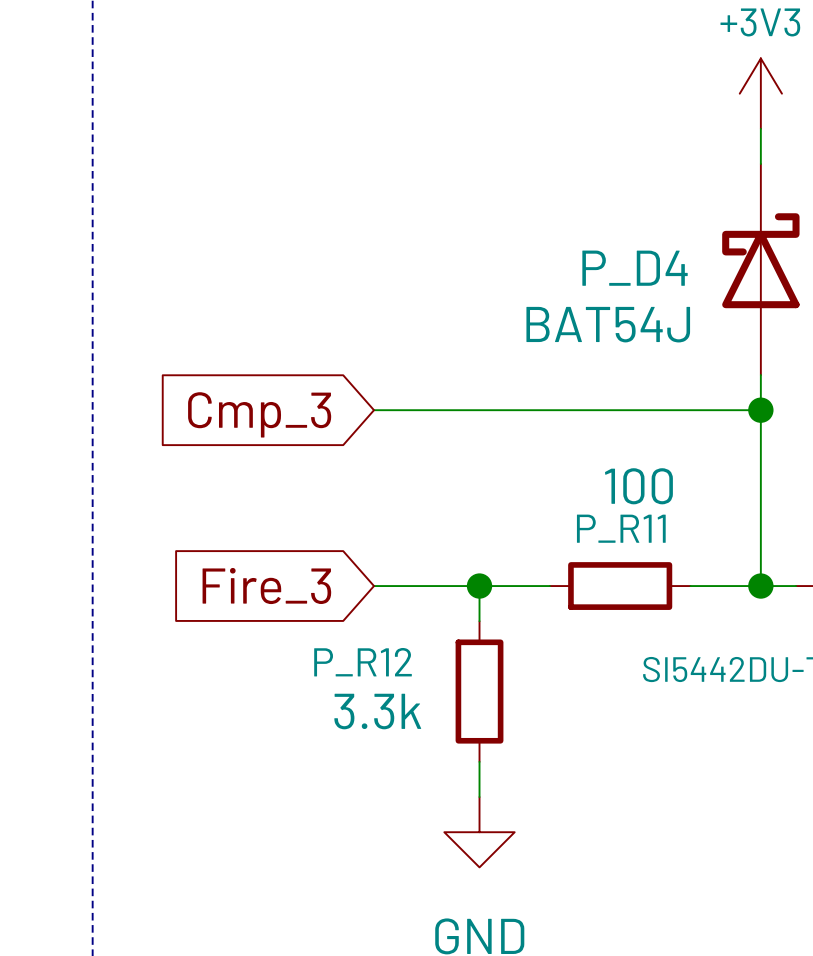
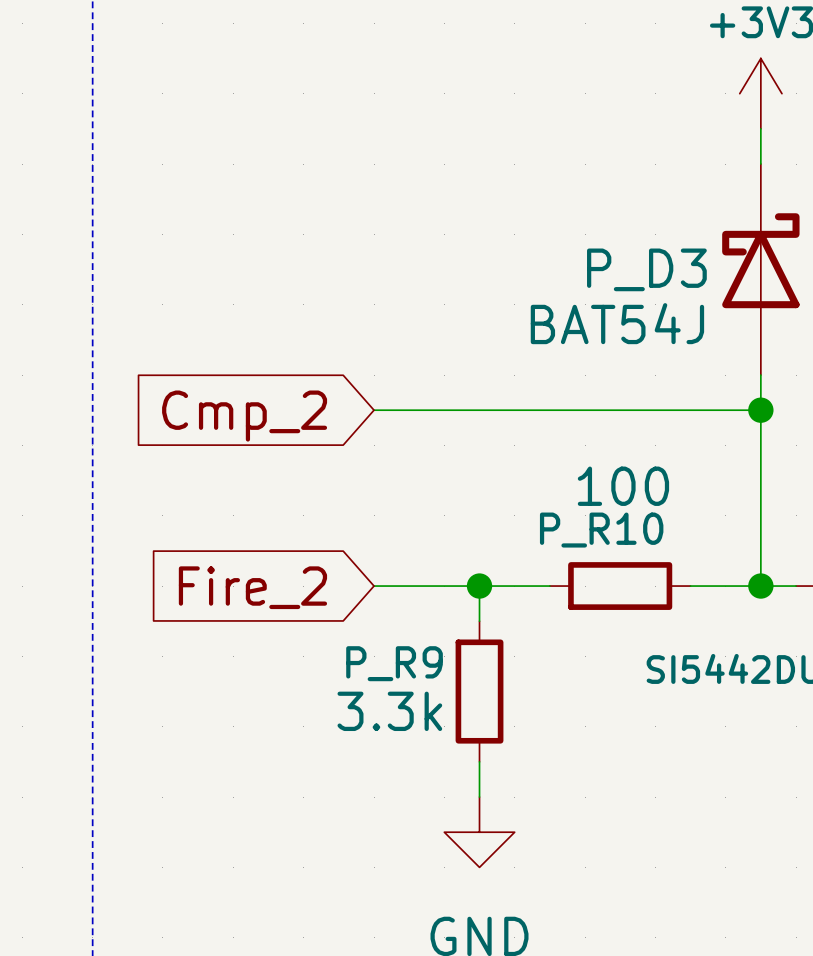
P_D4 name: P_D4 (635, 268) -> P_D3 (646, 269)
global label: Cmp_3 (259, 414) -> Cmp_2 (244, 416)
P_R11 name: P_R11 (621, 528) -> P_R10 (601, 530)
global label: Fire_3 (266, 586) -> Fire_2 (252, 587)
P_R12 name: P_R12 (363, 662) -> P_R9 (394, 663)

